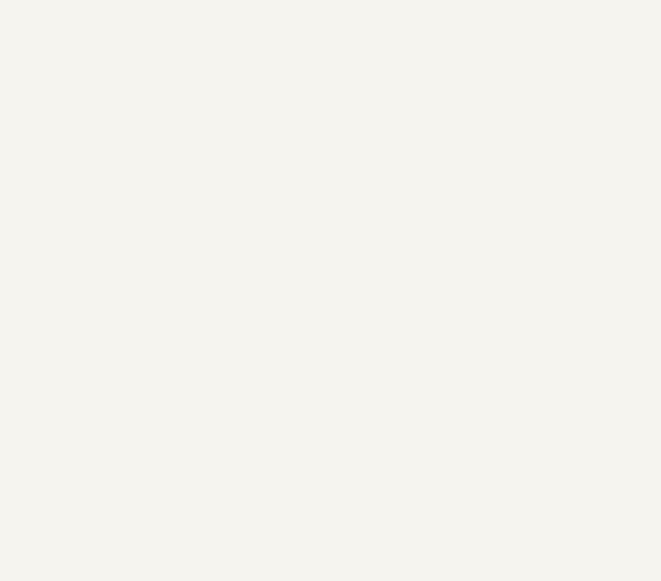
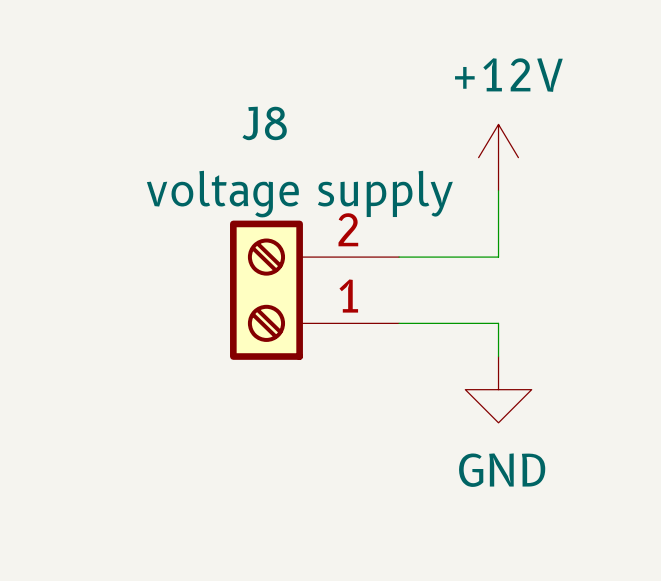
power symbol: none -> +12V (498, 157)
wire: none -> (498, 190) (498, 257) (399, 257)
J8: none -> voltage supply (314, 290)
wire: none -> (399, 323) (498, 323) (498, 356)
power symbol: none -> GND (498, 389)

